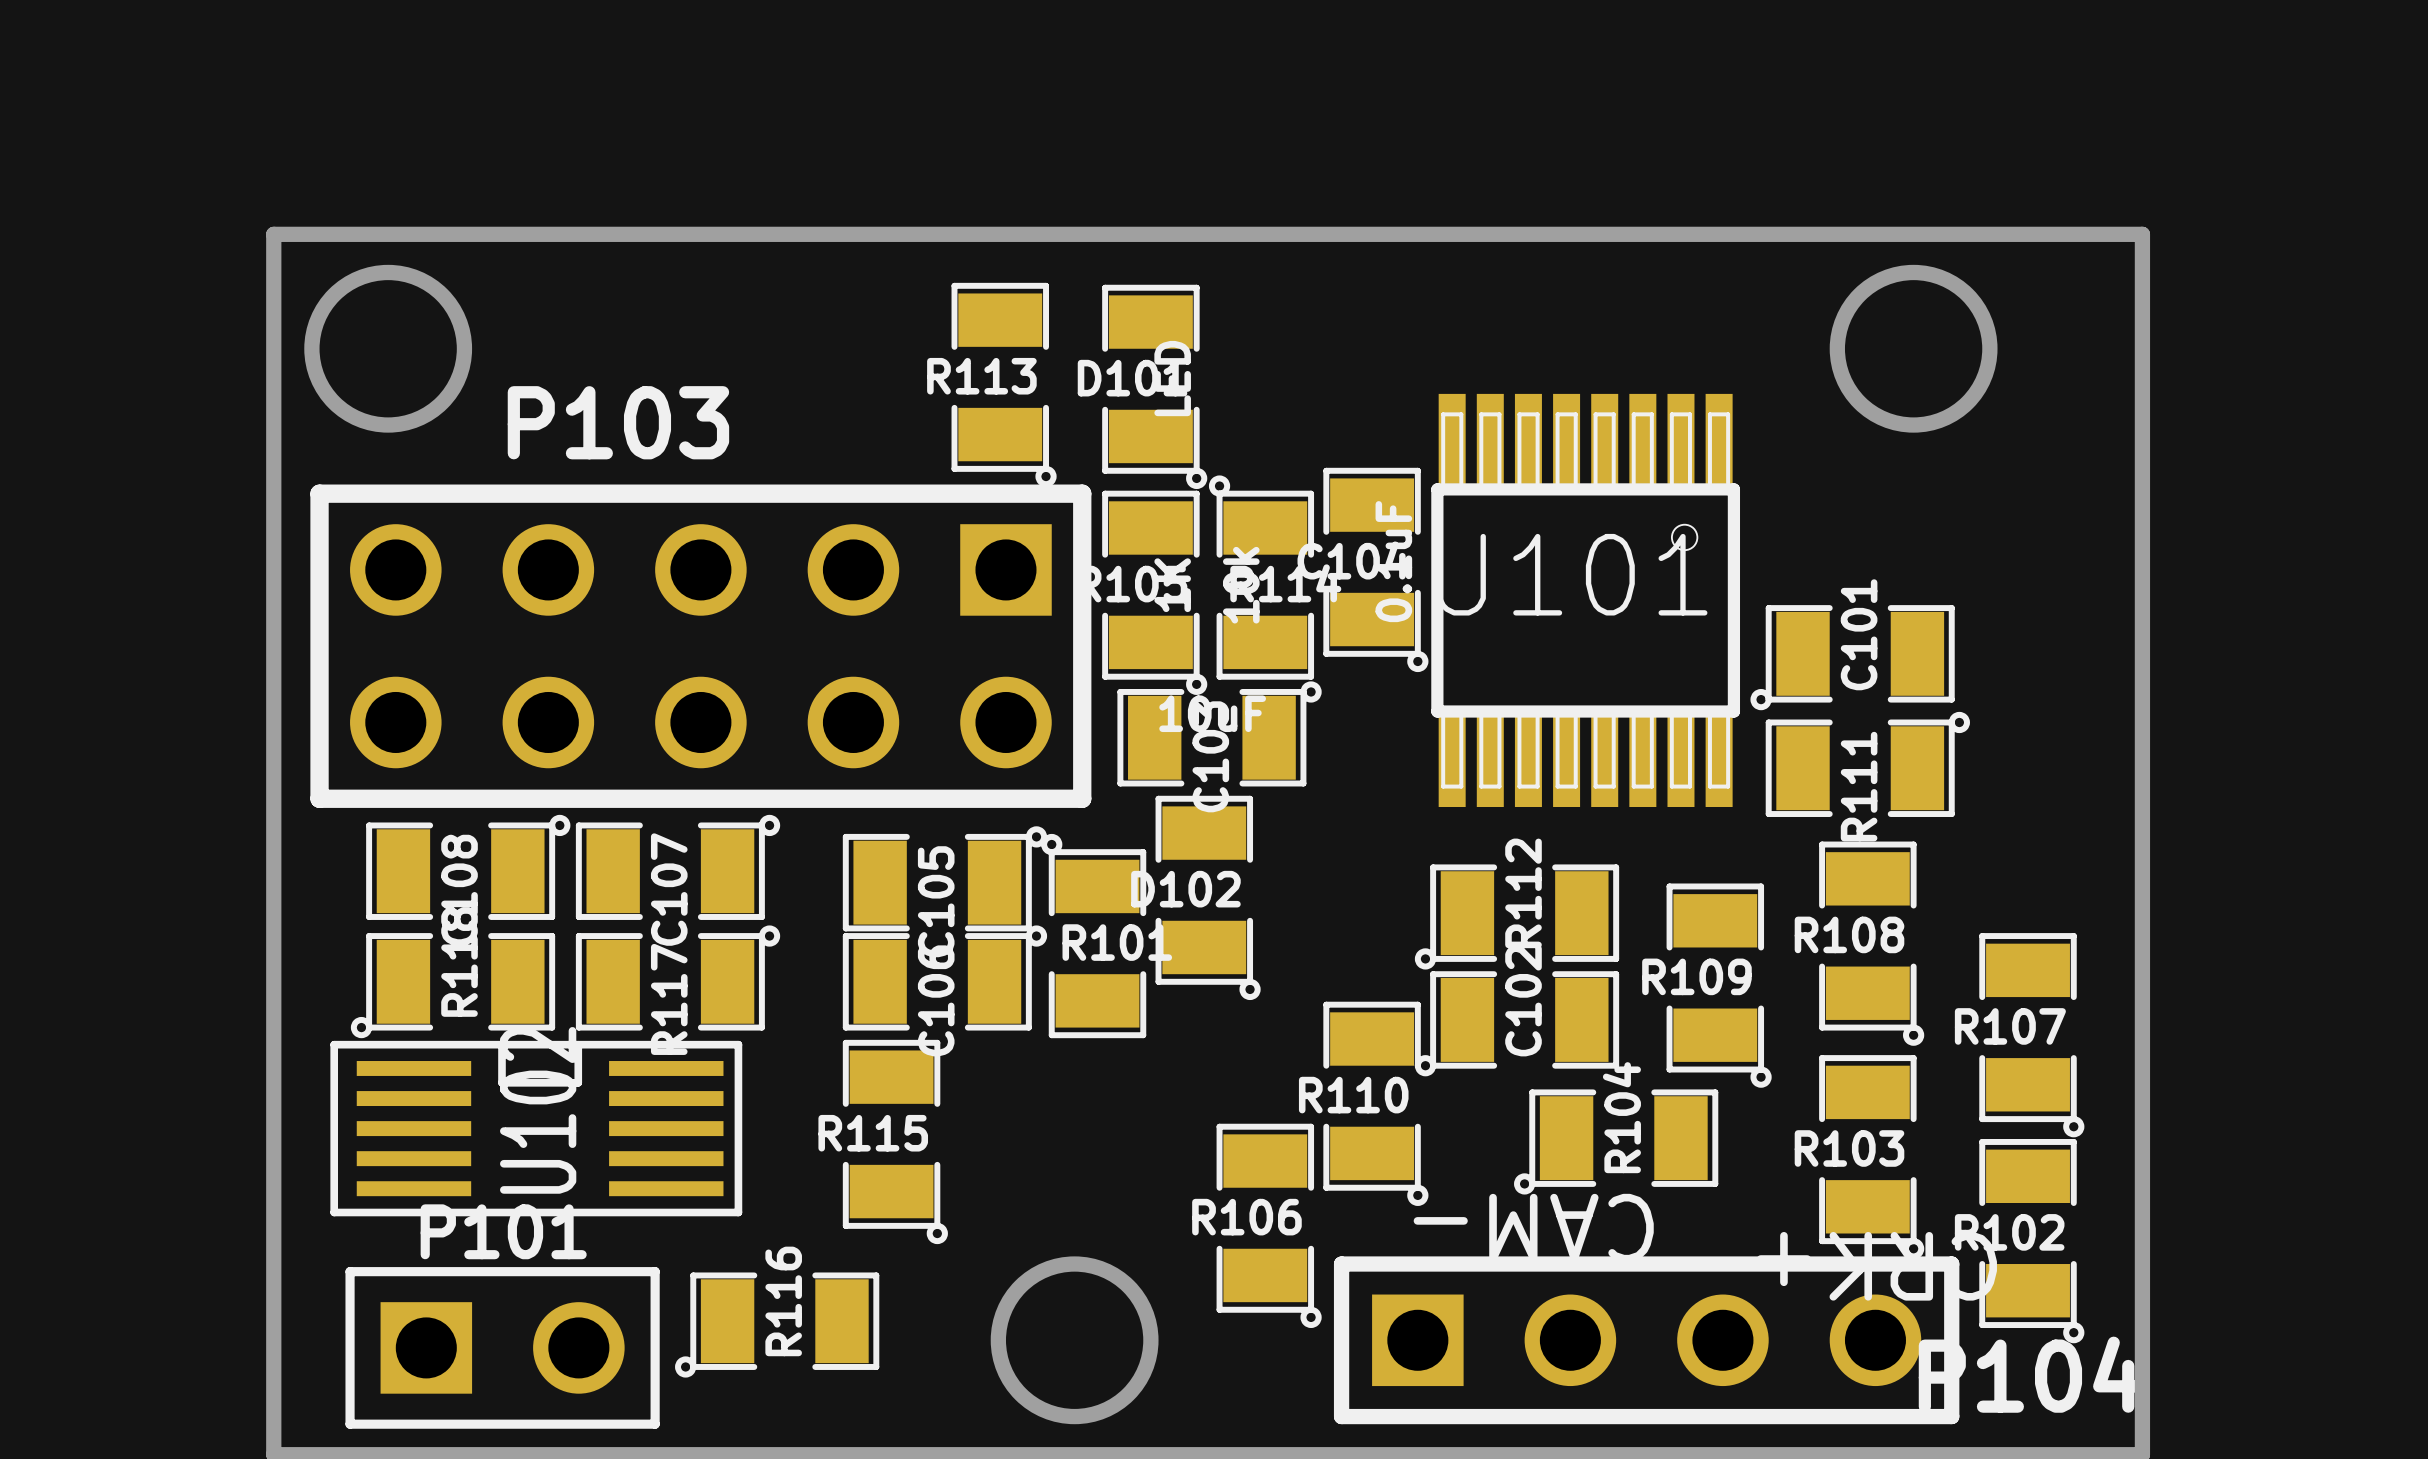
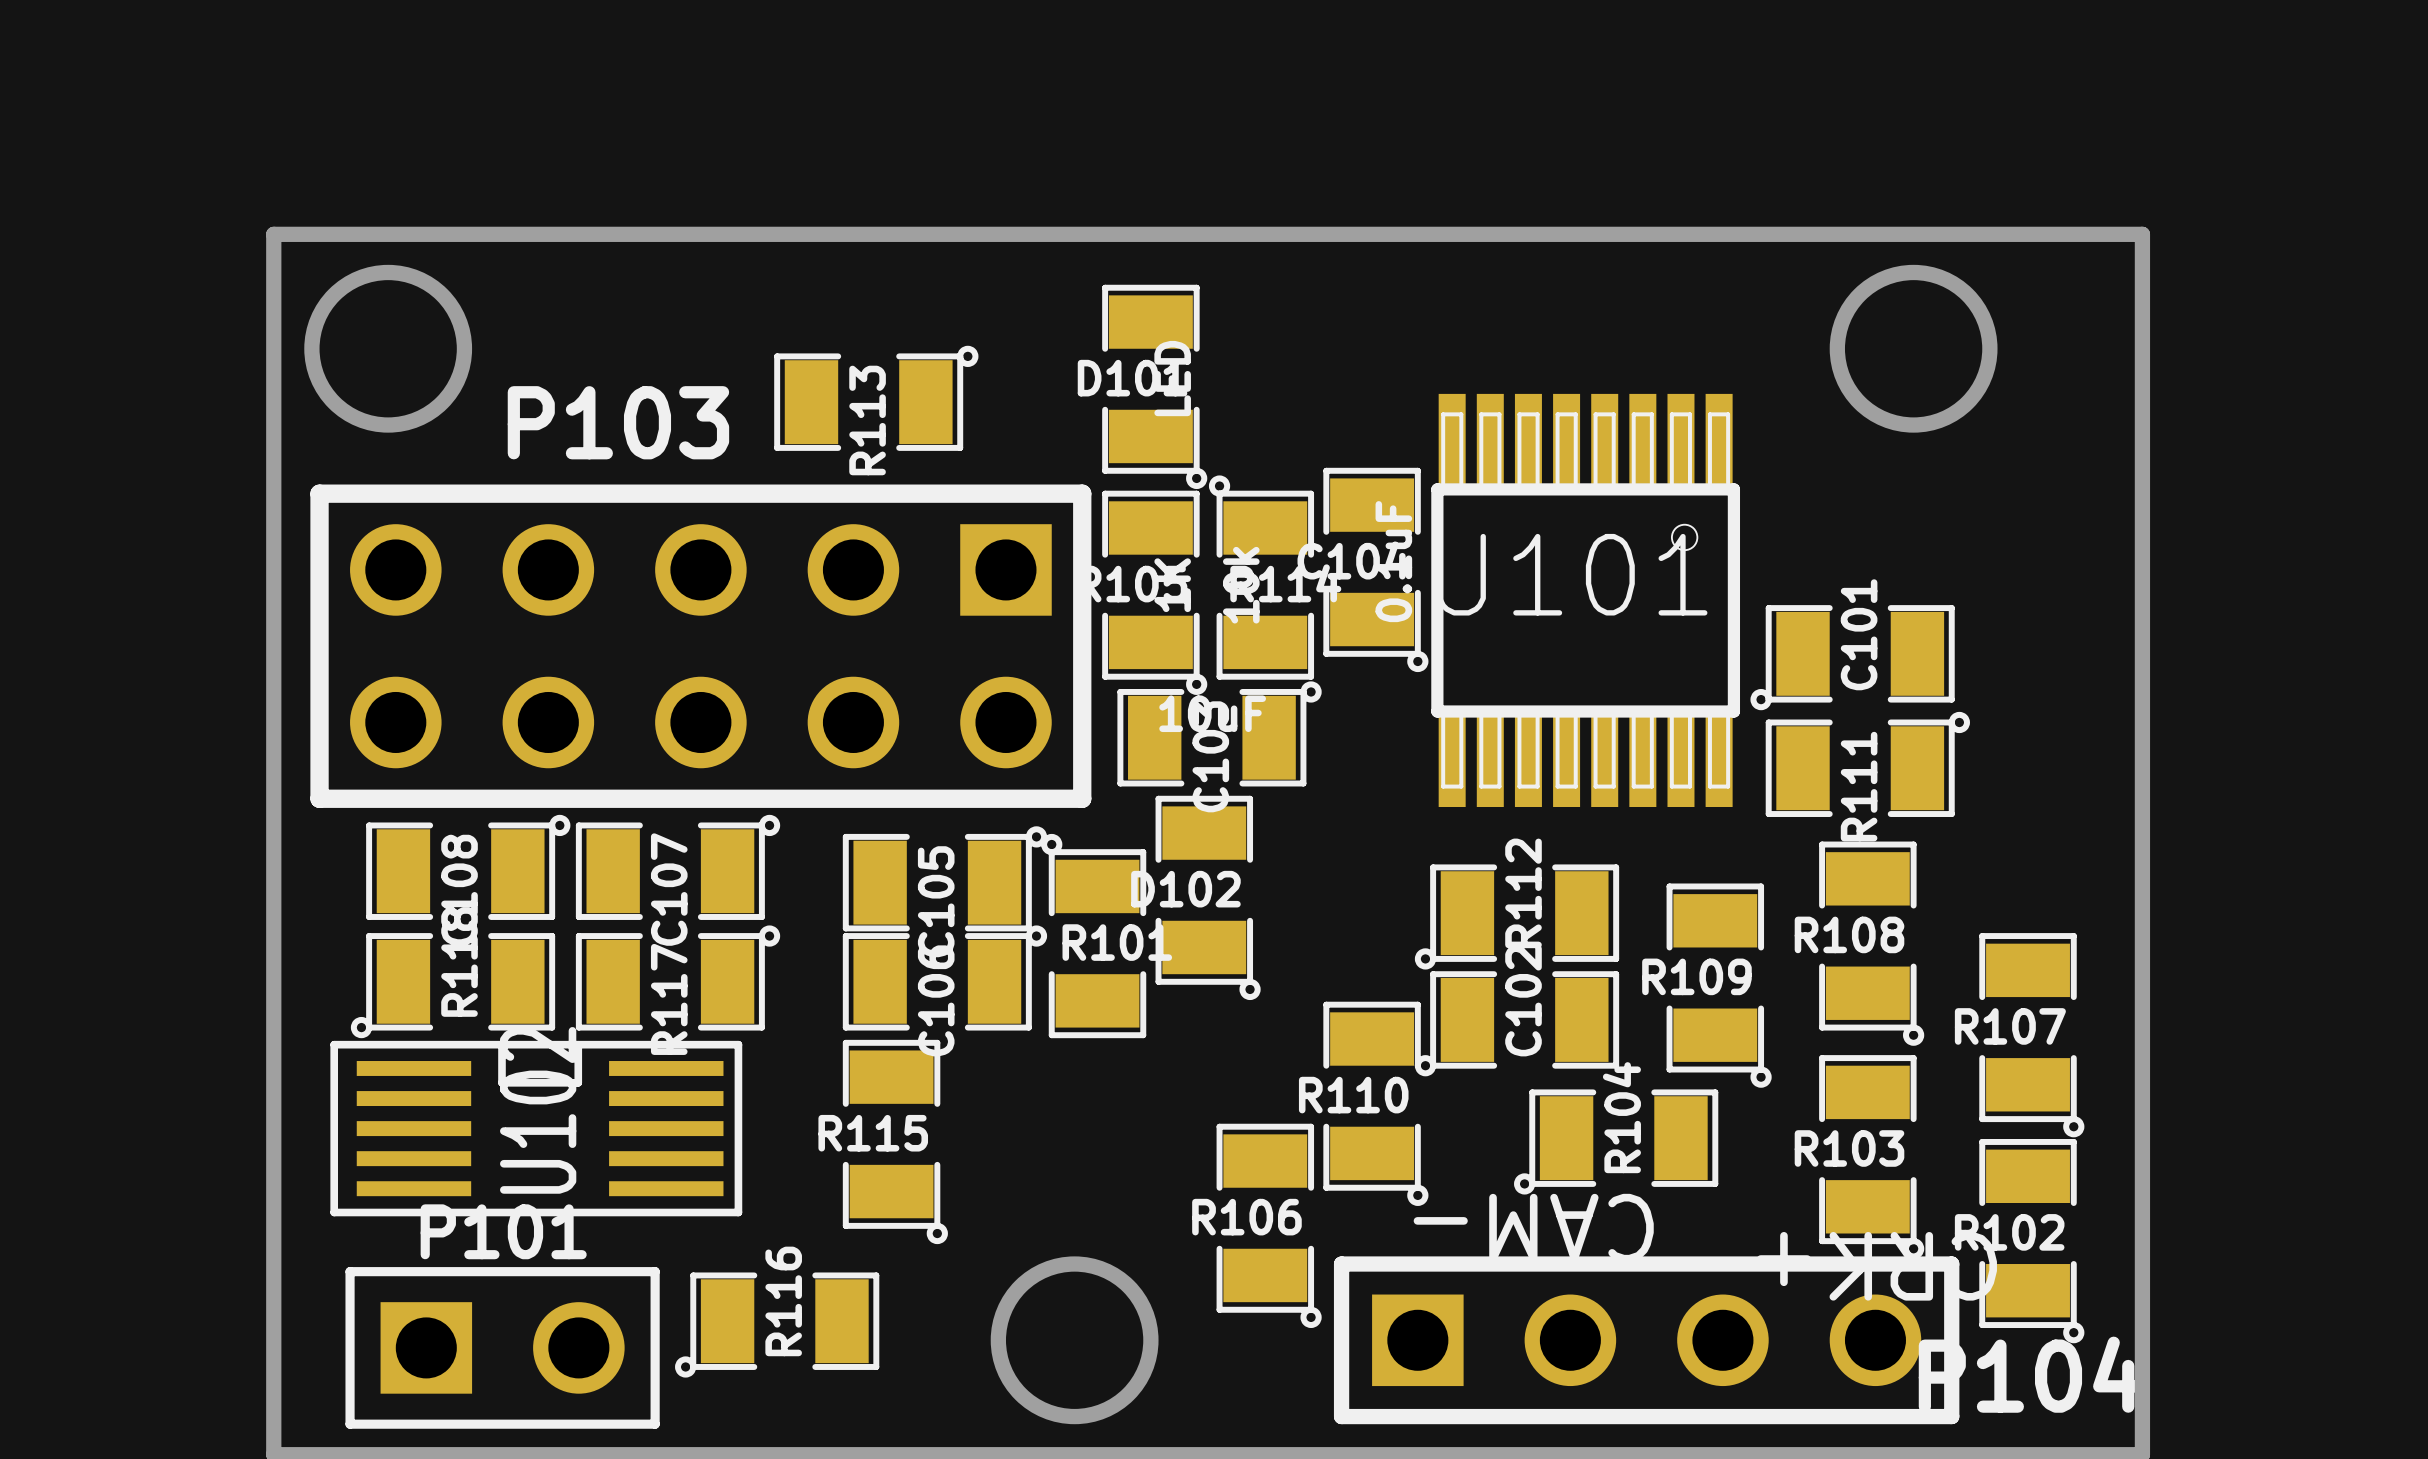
R113 rotation: 0° (1004, 384) -> 90° counterclockwise (876, 398)
R113 position: (1004, 384) -> (876, 398)

